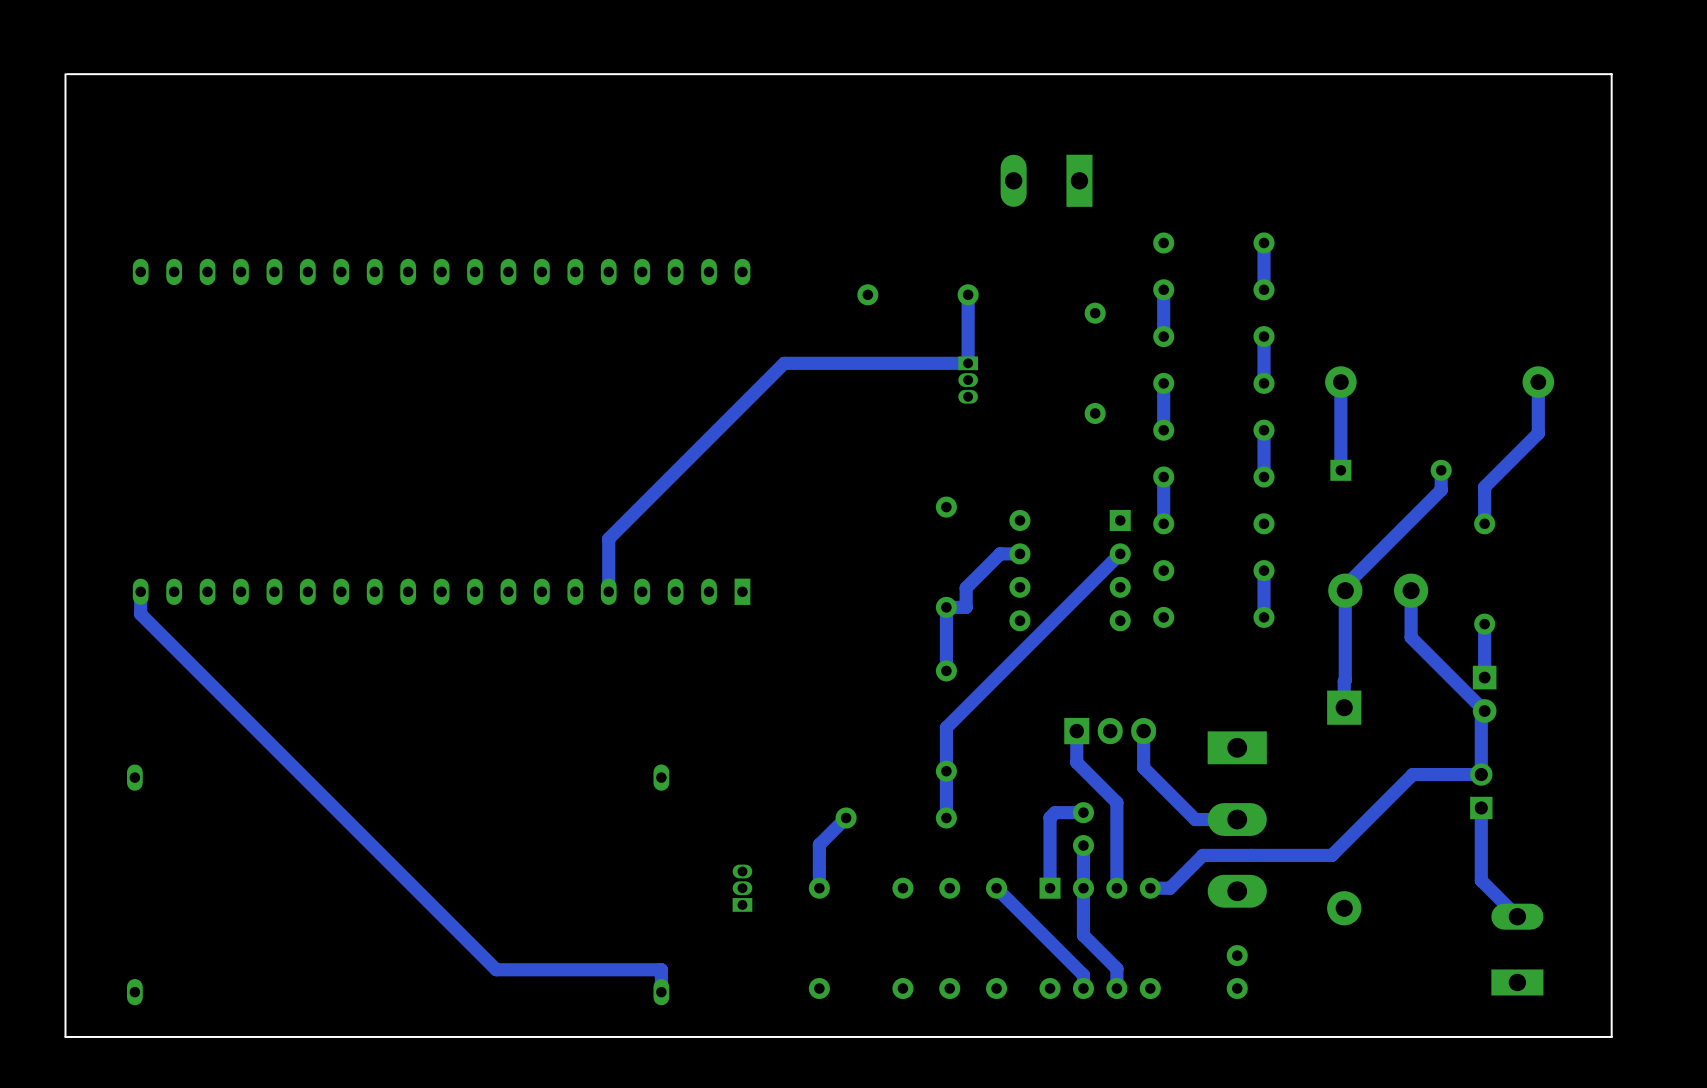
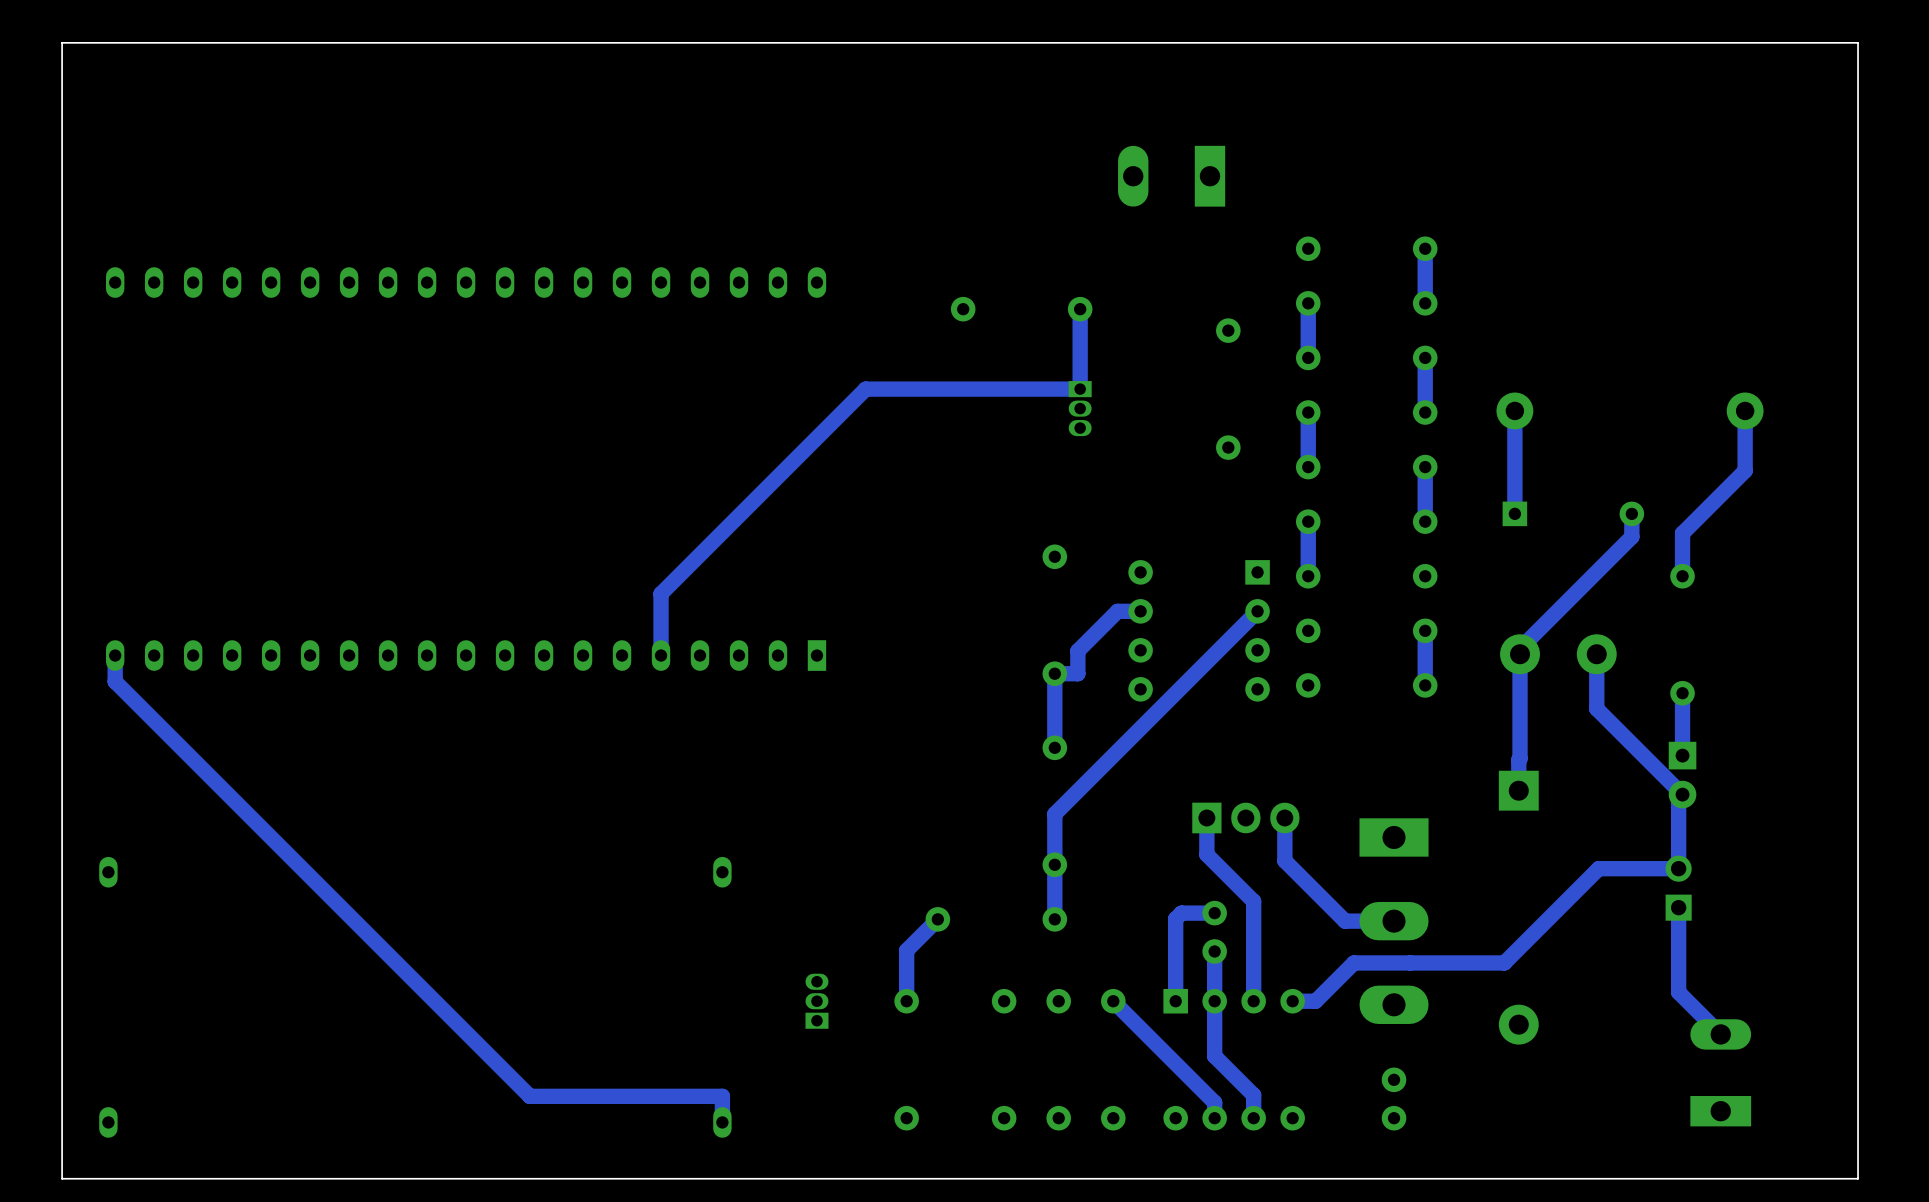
board edge: none -> (1858, 42) (62, 42) (62, 1178) (1858, 1178) (1858, 42)
board edge: (67, 74) (1611, 74) (1611, 1036) (65, 1036) (65, 74) -> none

